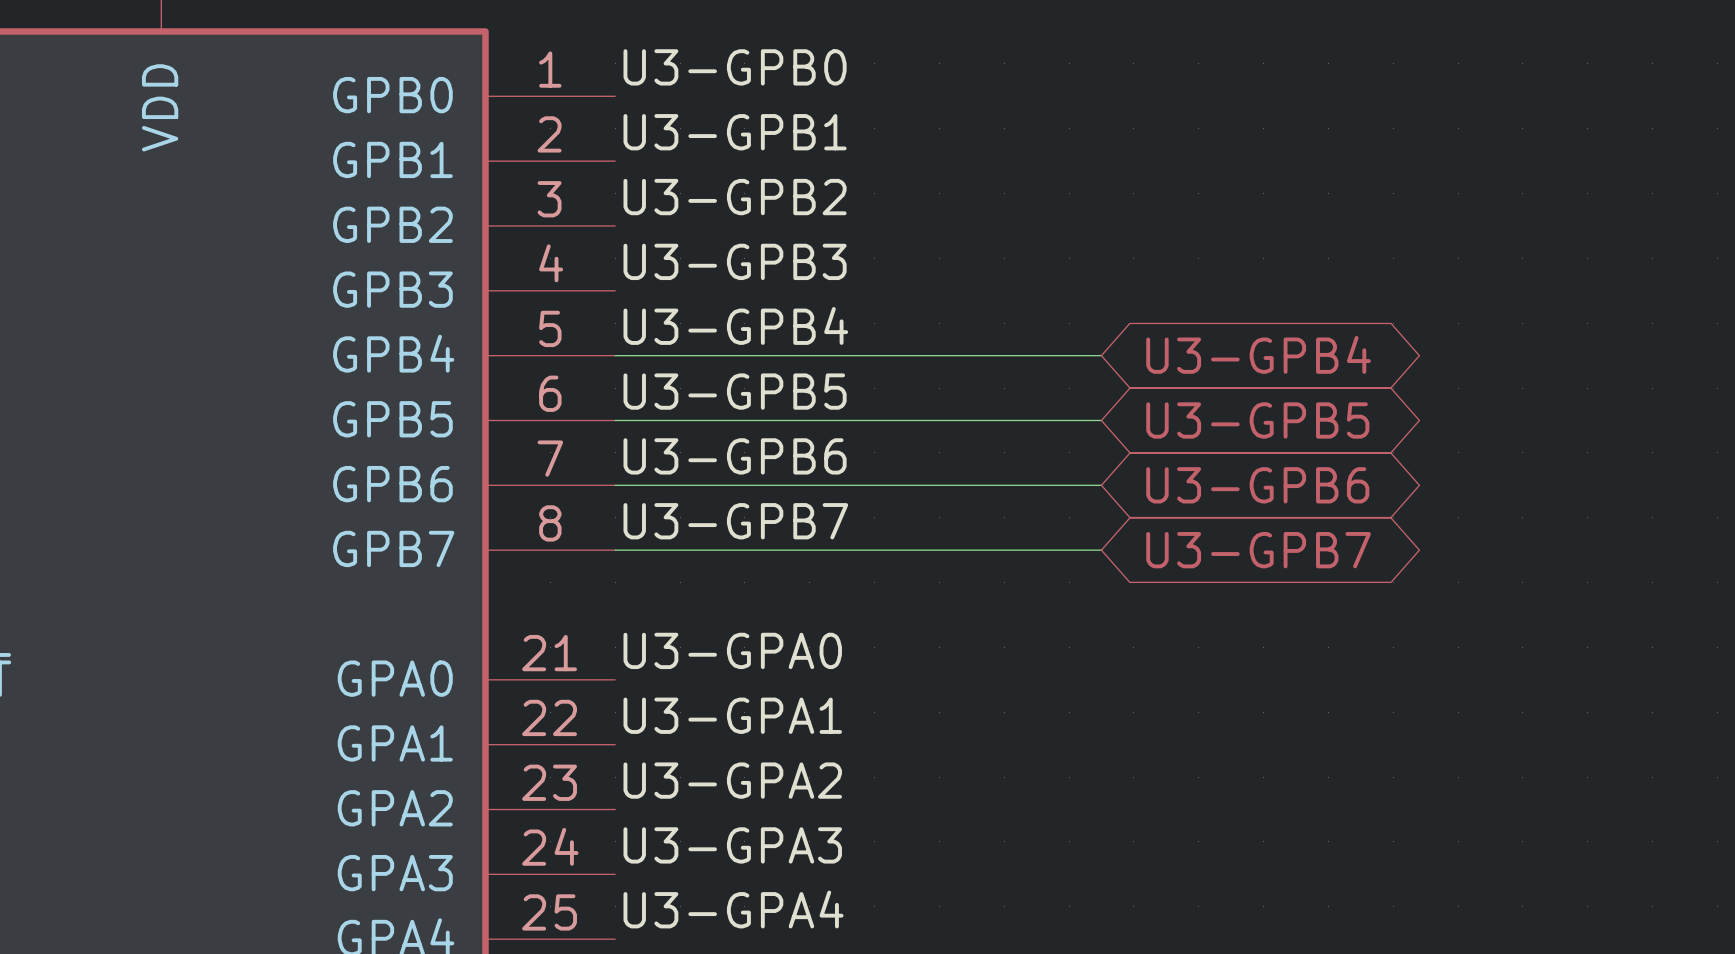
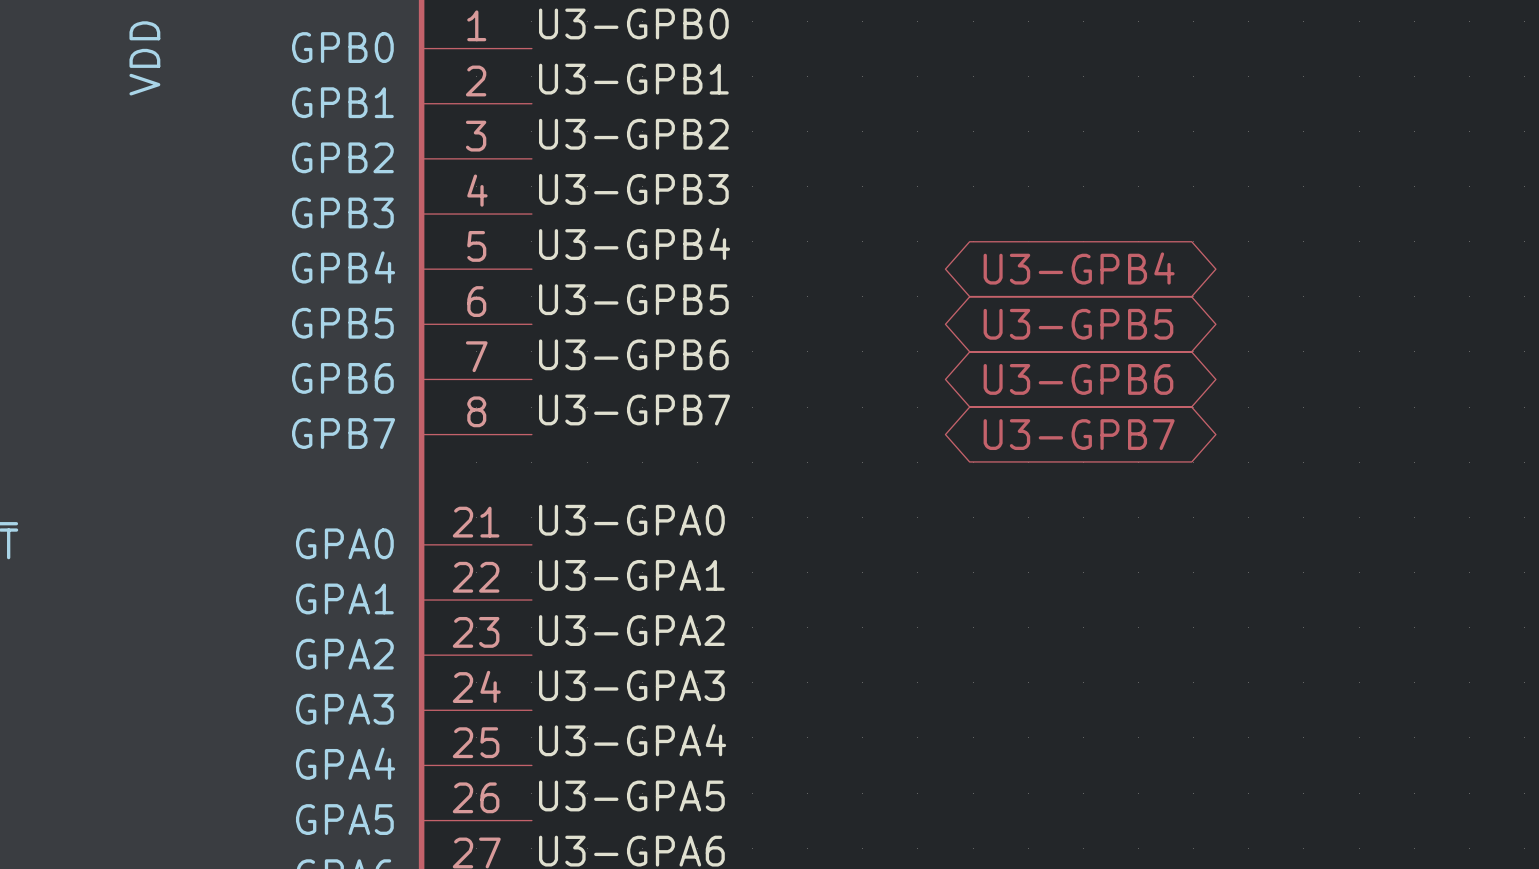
wire: (615, 355) (1101, 355) -> none
wire: (615, 420) (1101, 420) -> none
wire: (615, 485) (1101, 485) -> none
wire: (615, 550) (1101, 550) -> none

